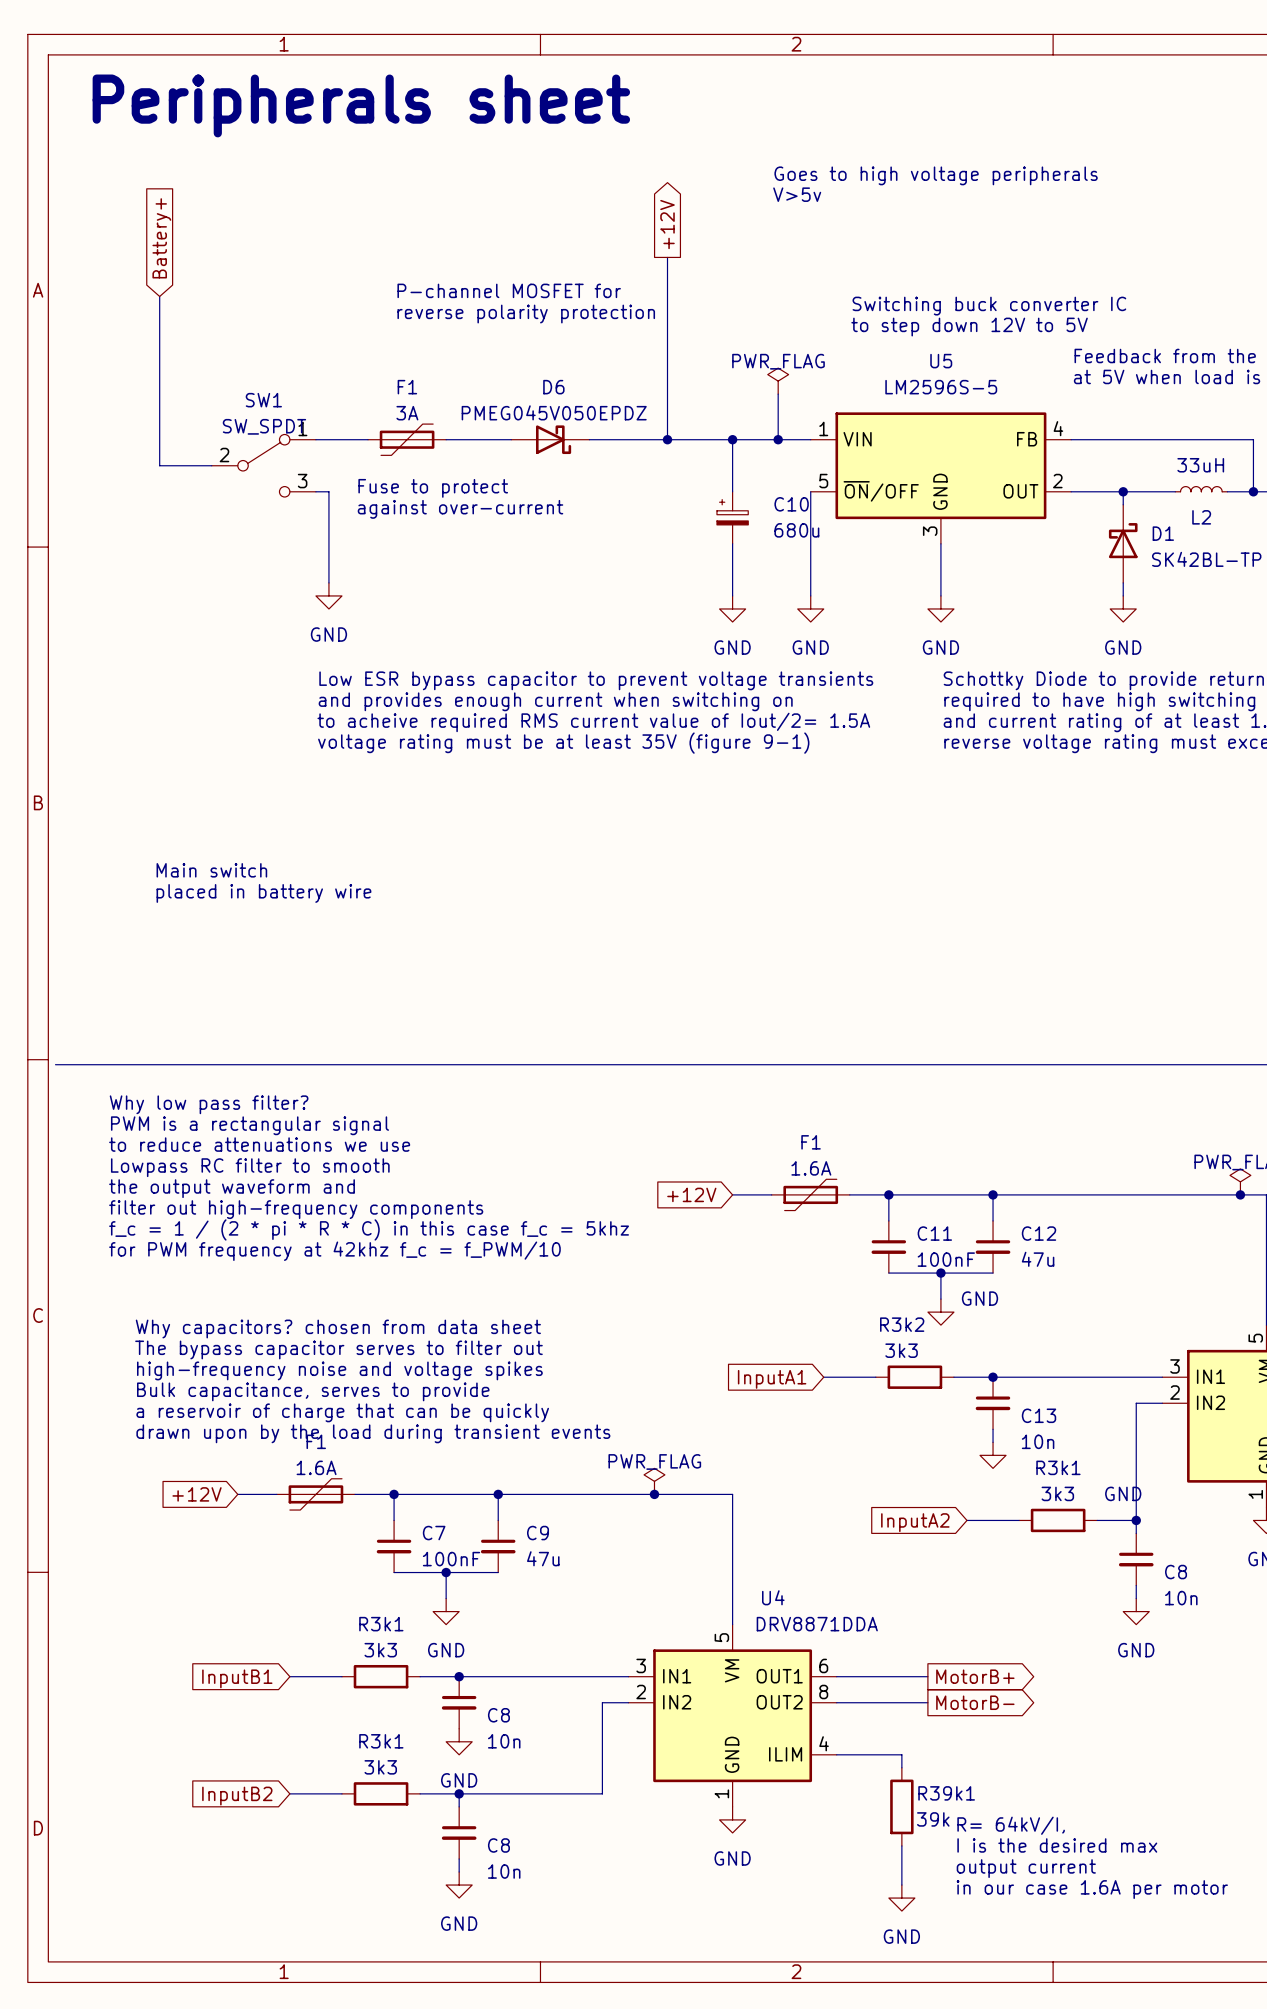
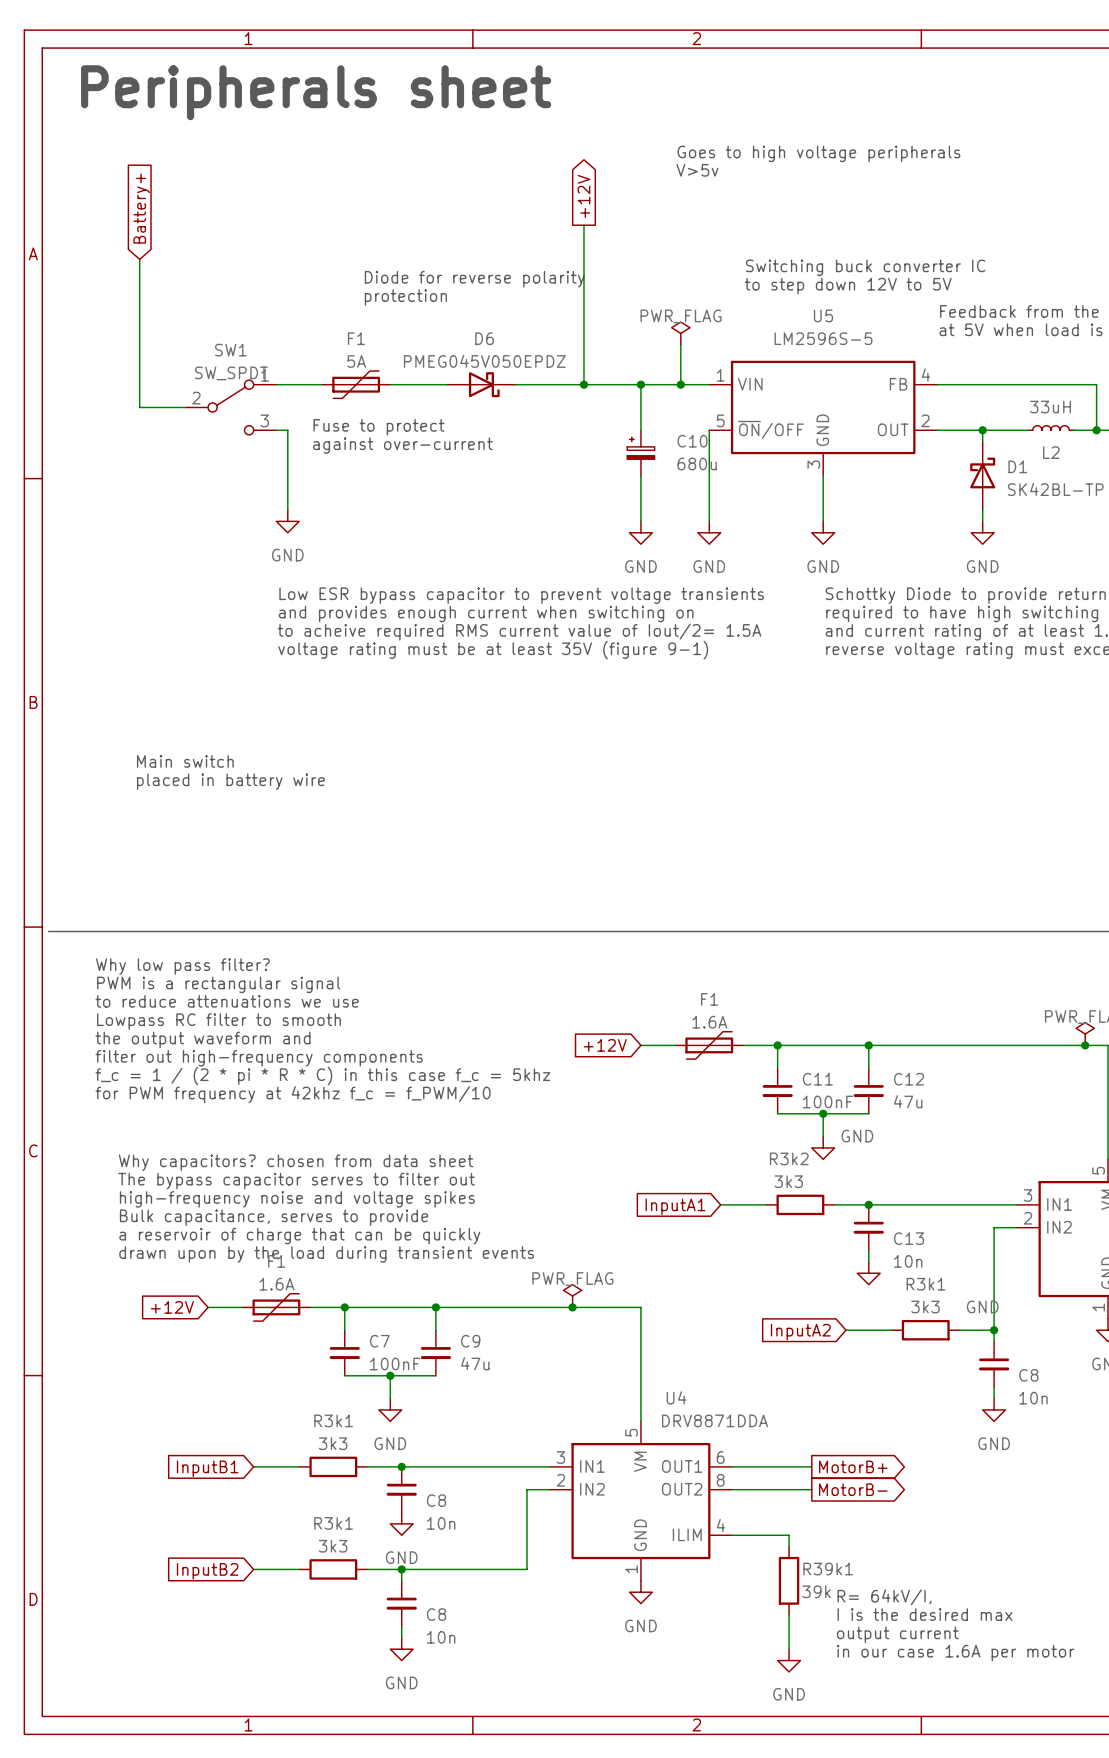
text: P-channel MOSFET for (509, 290) -> none
text: reverse polarity protection (526, 314) -> Diode for reverse polarity (474, 279)
text: none -> protection (405, 297)
F1 value: 3A (407, 413) -> 5A (356, 361)

